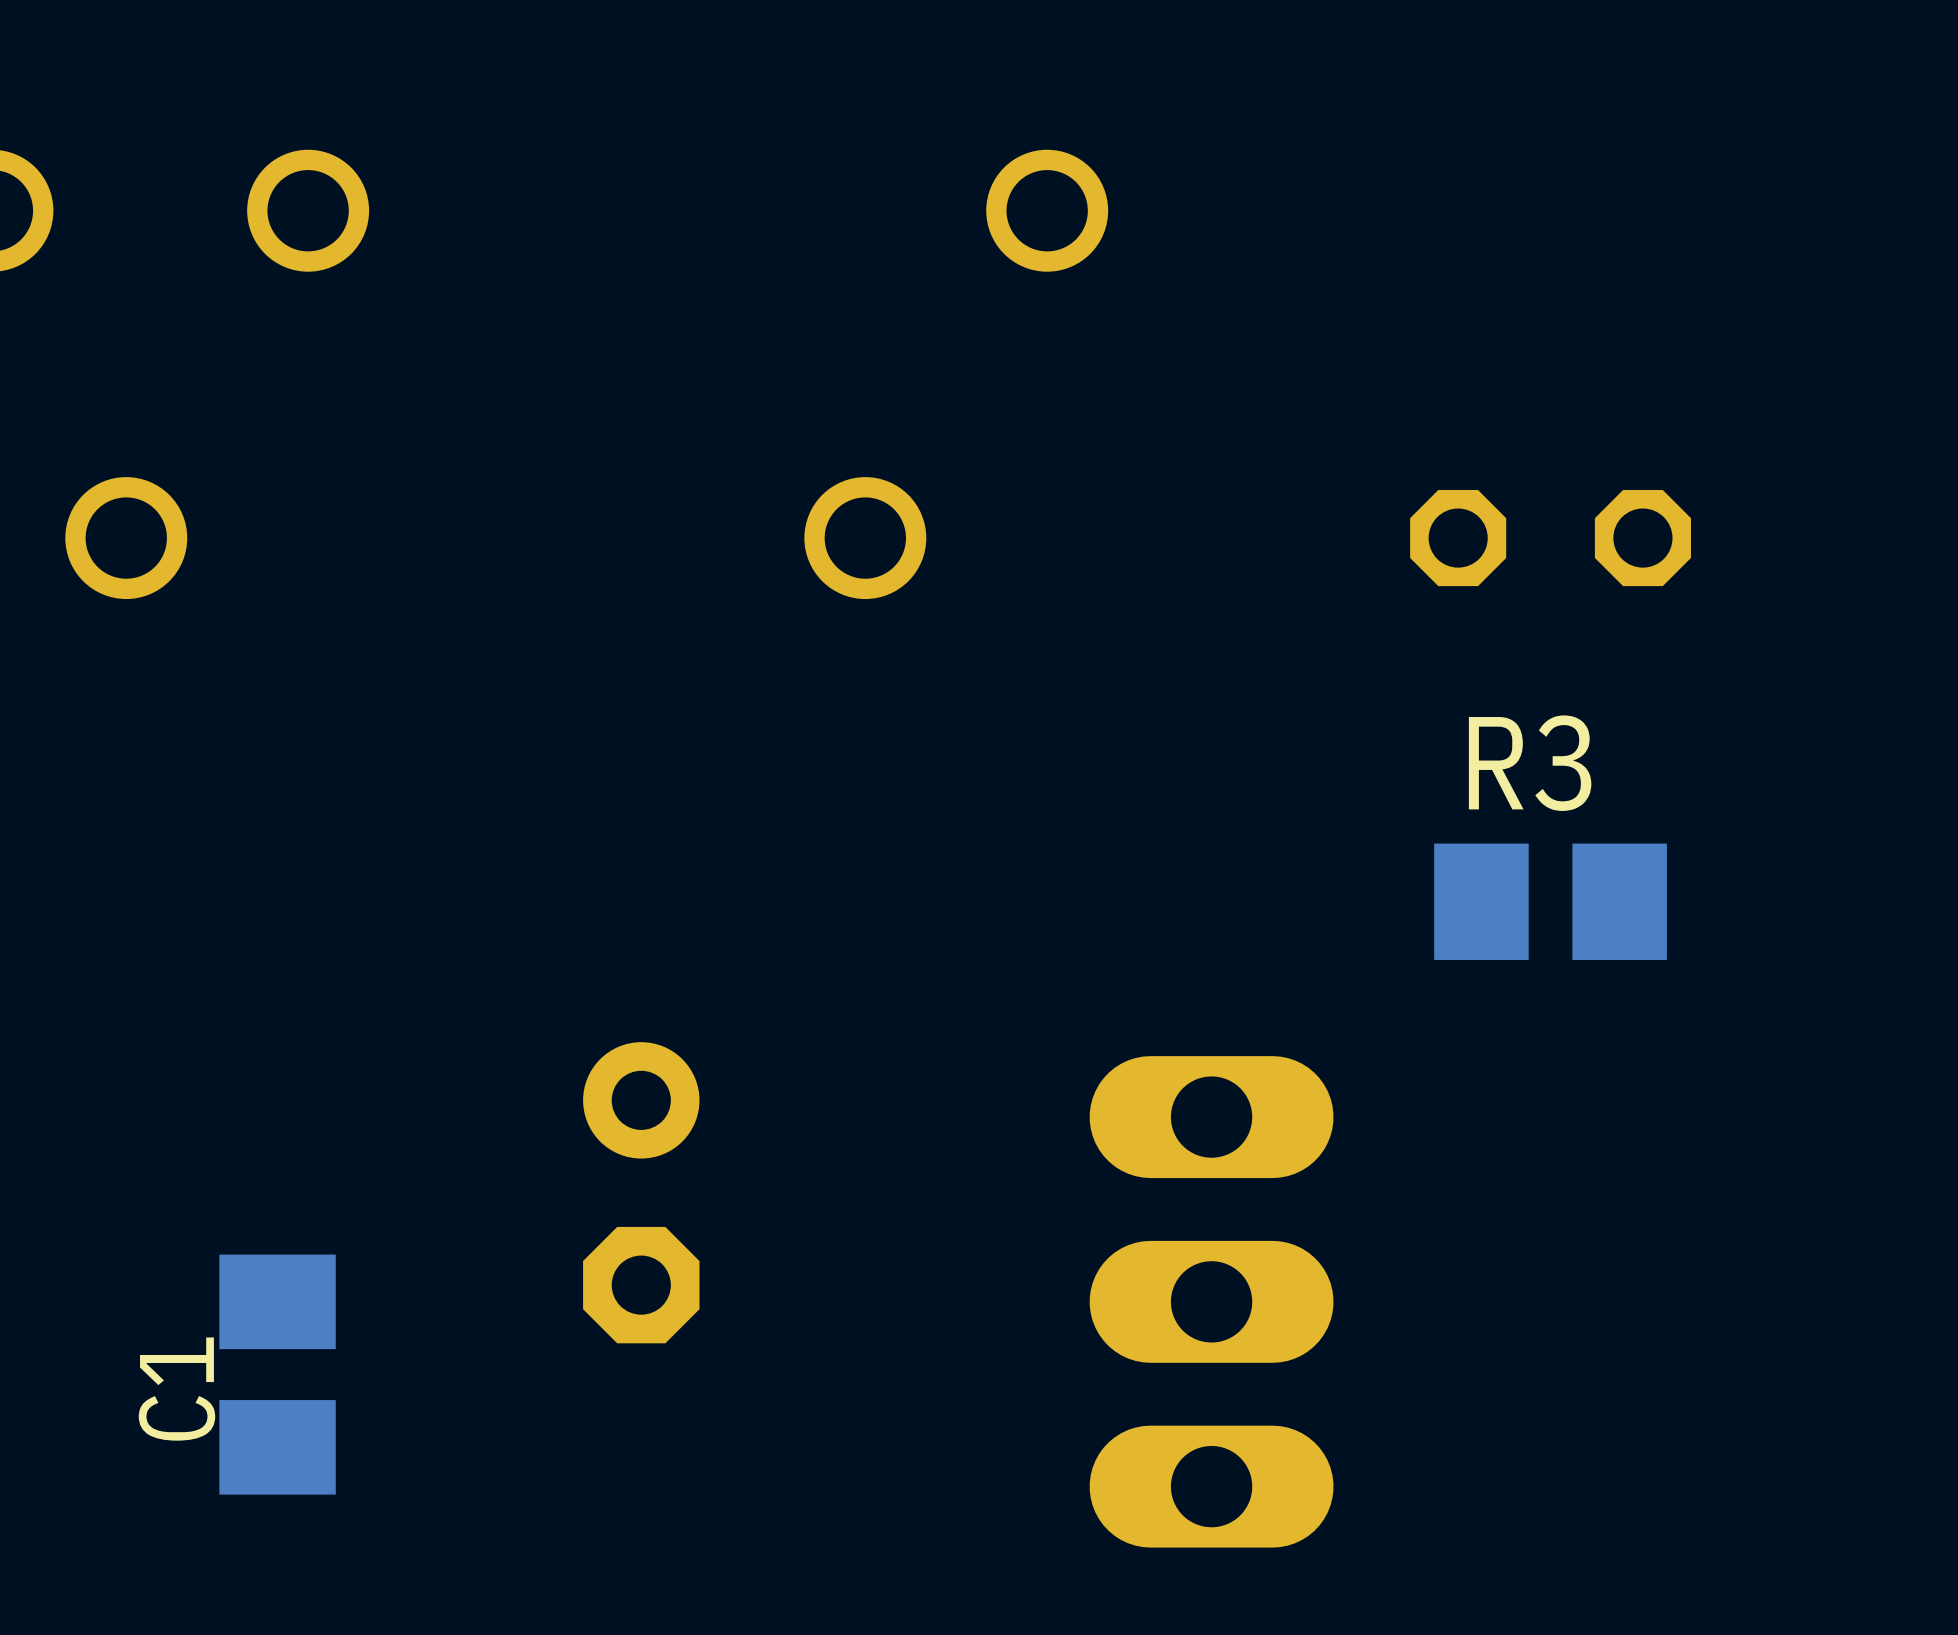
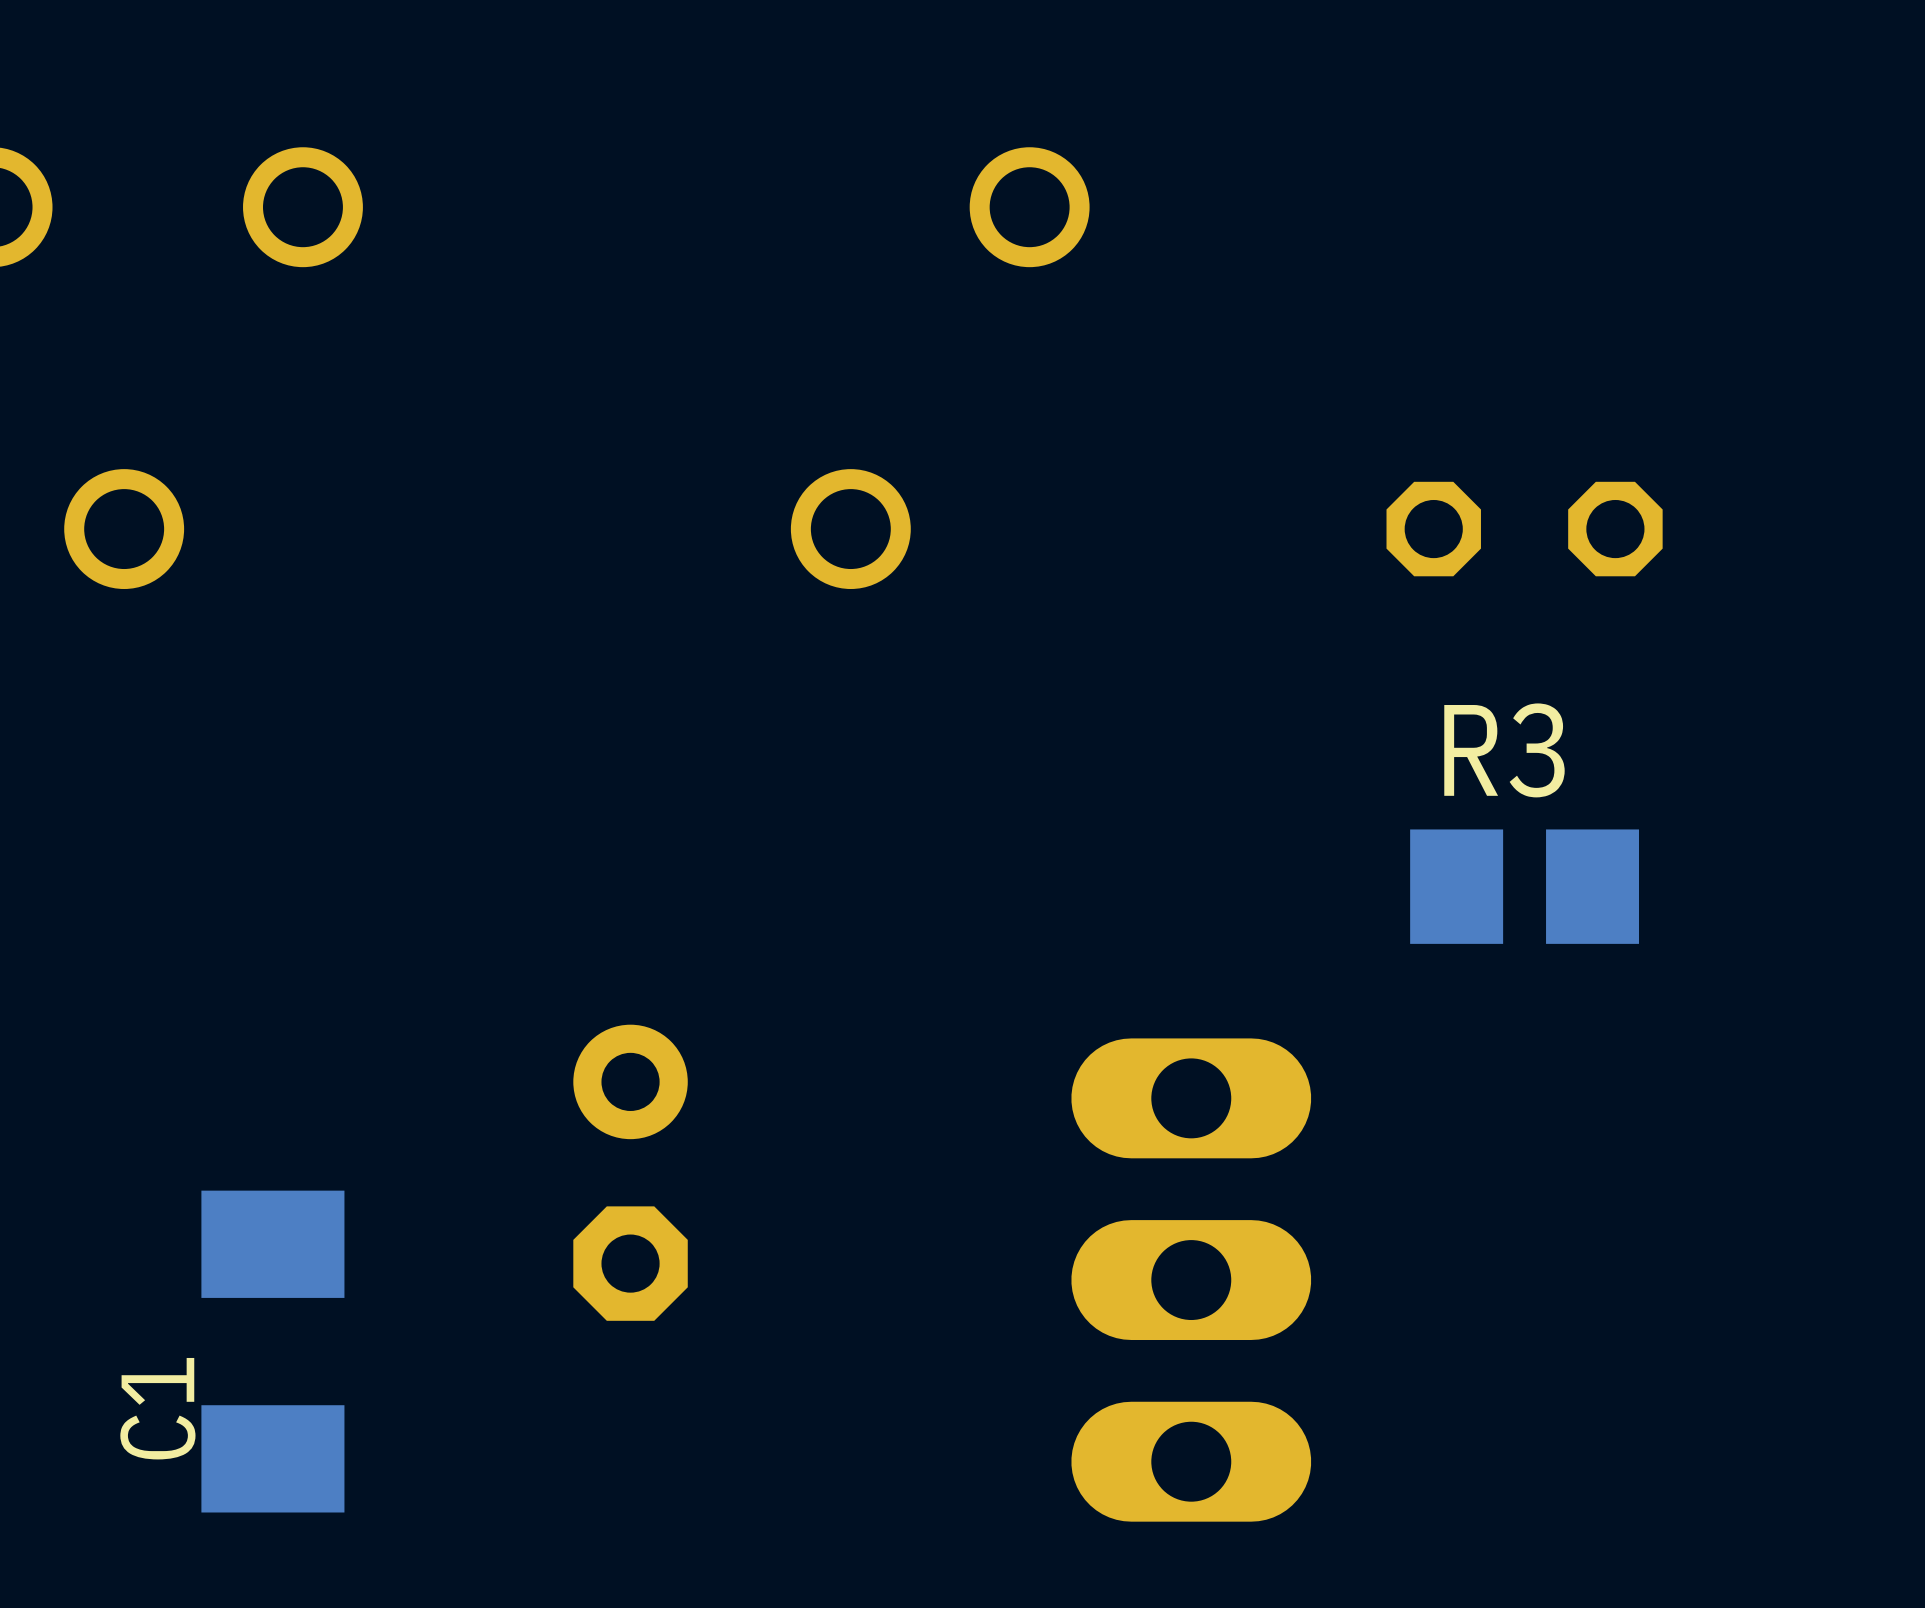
C1 footprint: [219, 1254, 336, 1495] -> [201, 1190, 345, 1513]
C1 name position: C1 (176, 1389) -> C1 (157, 1408)

